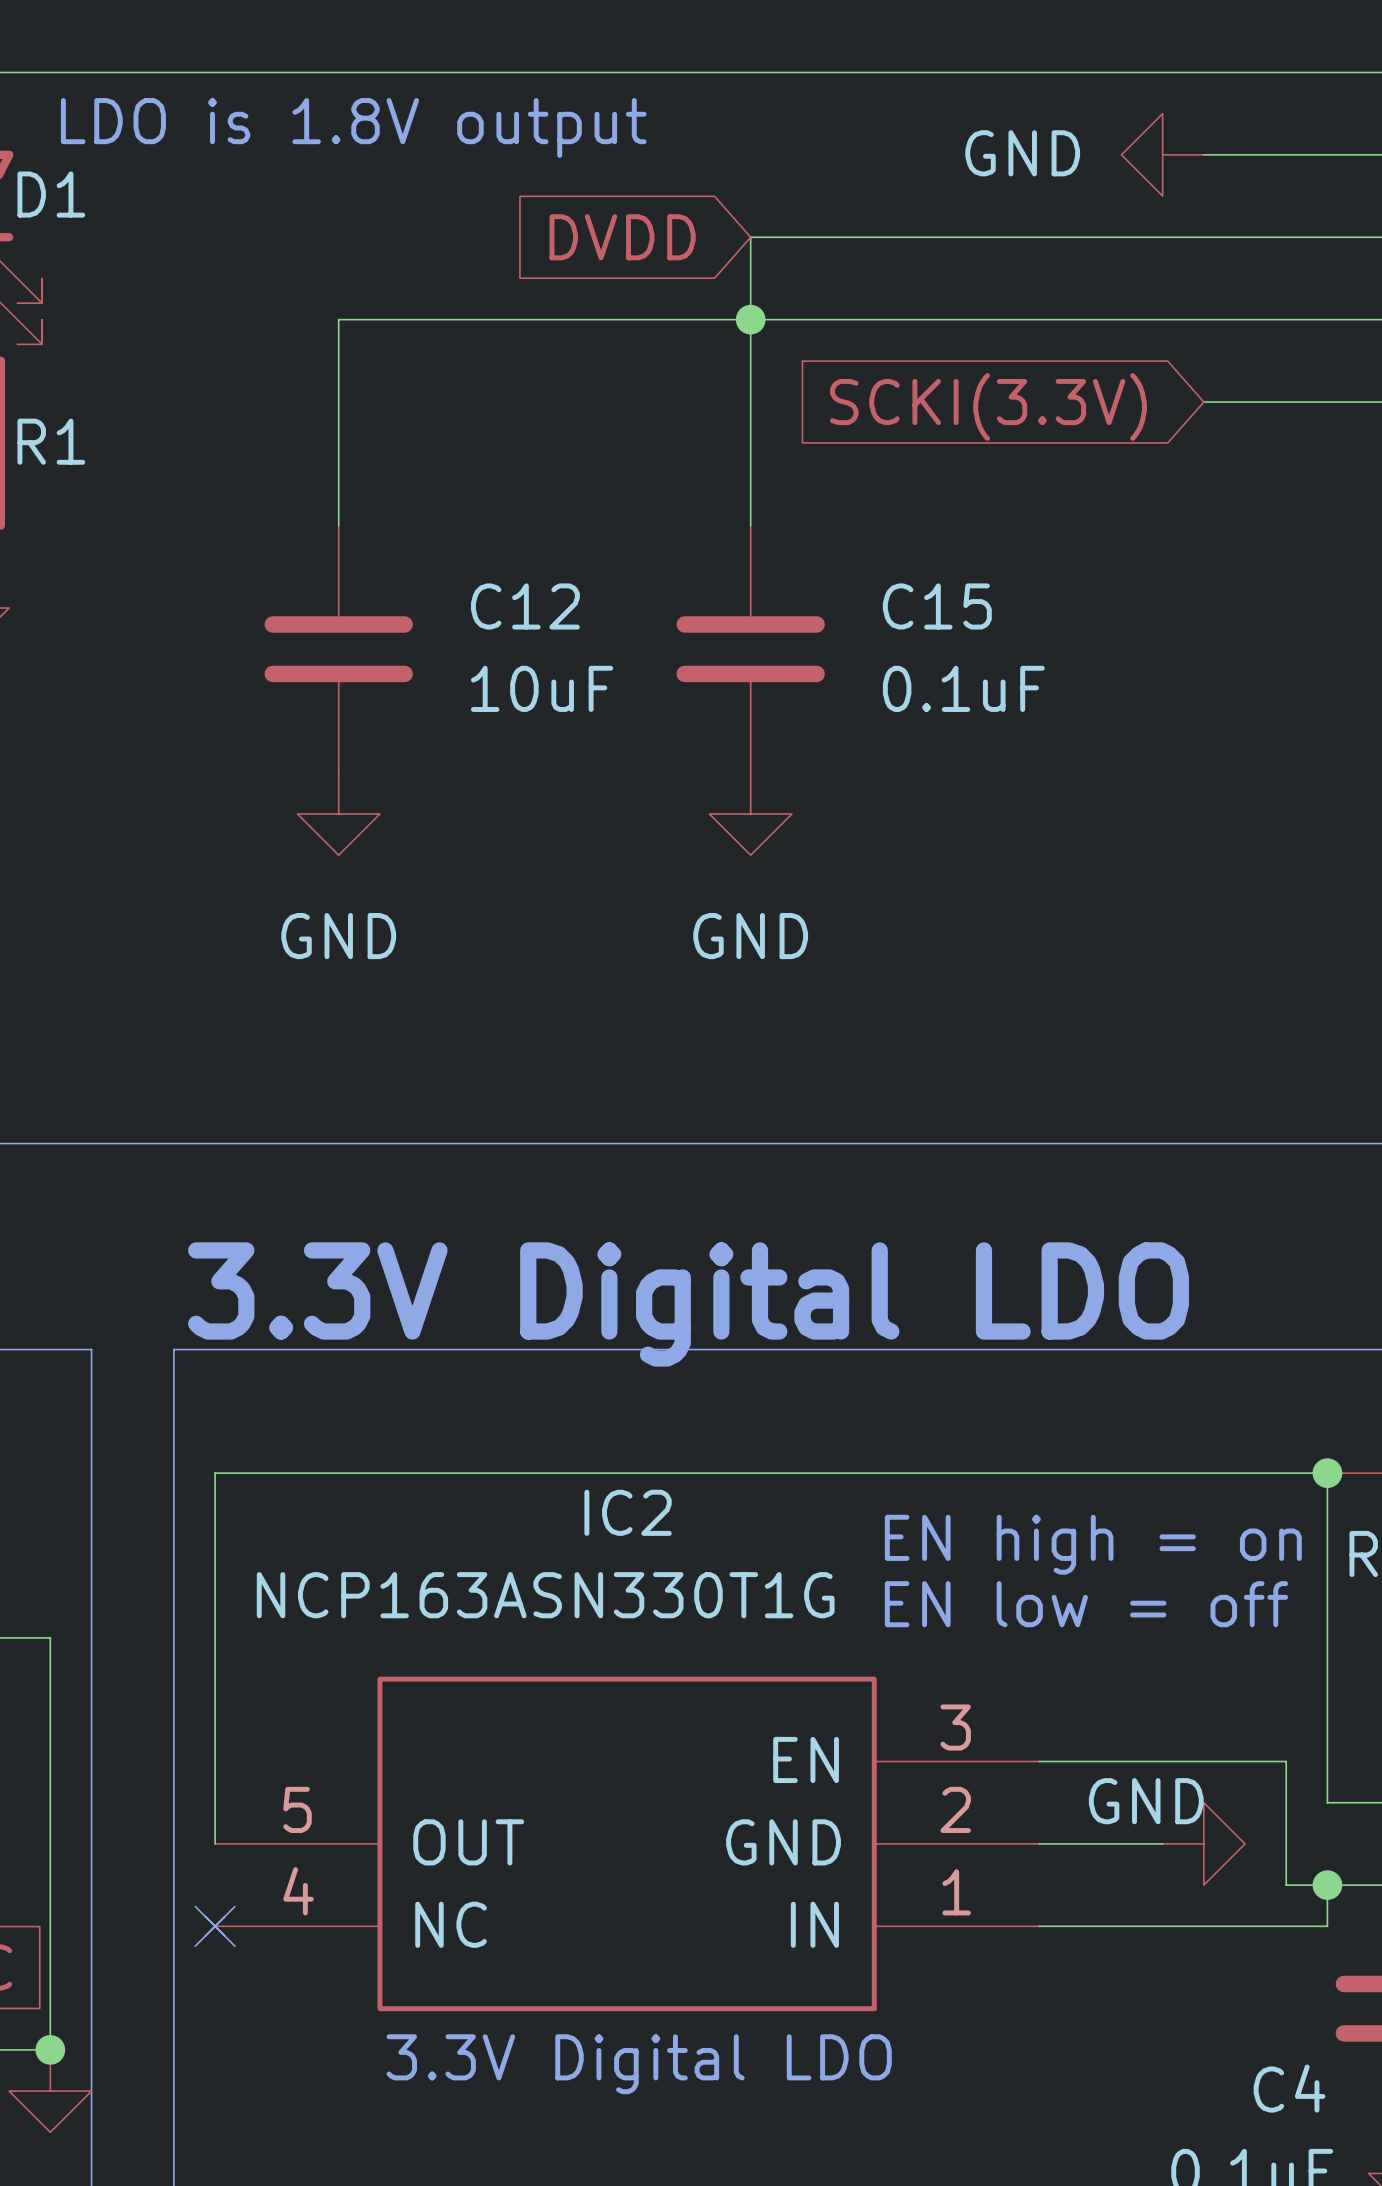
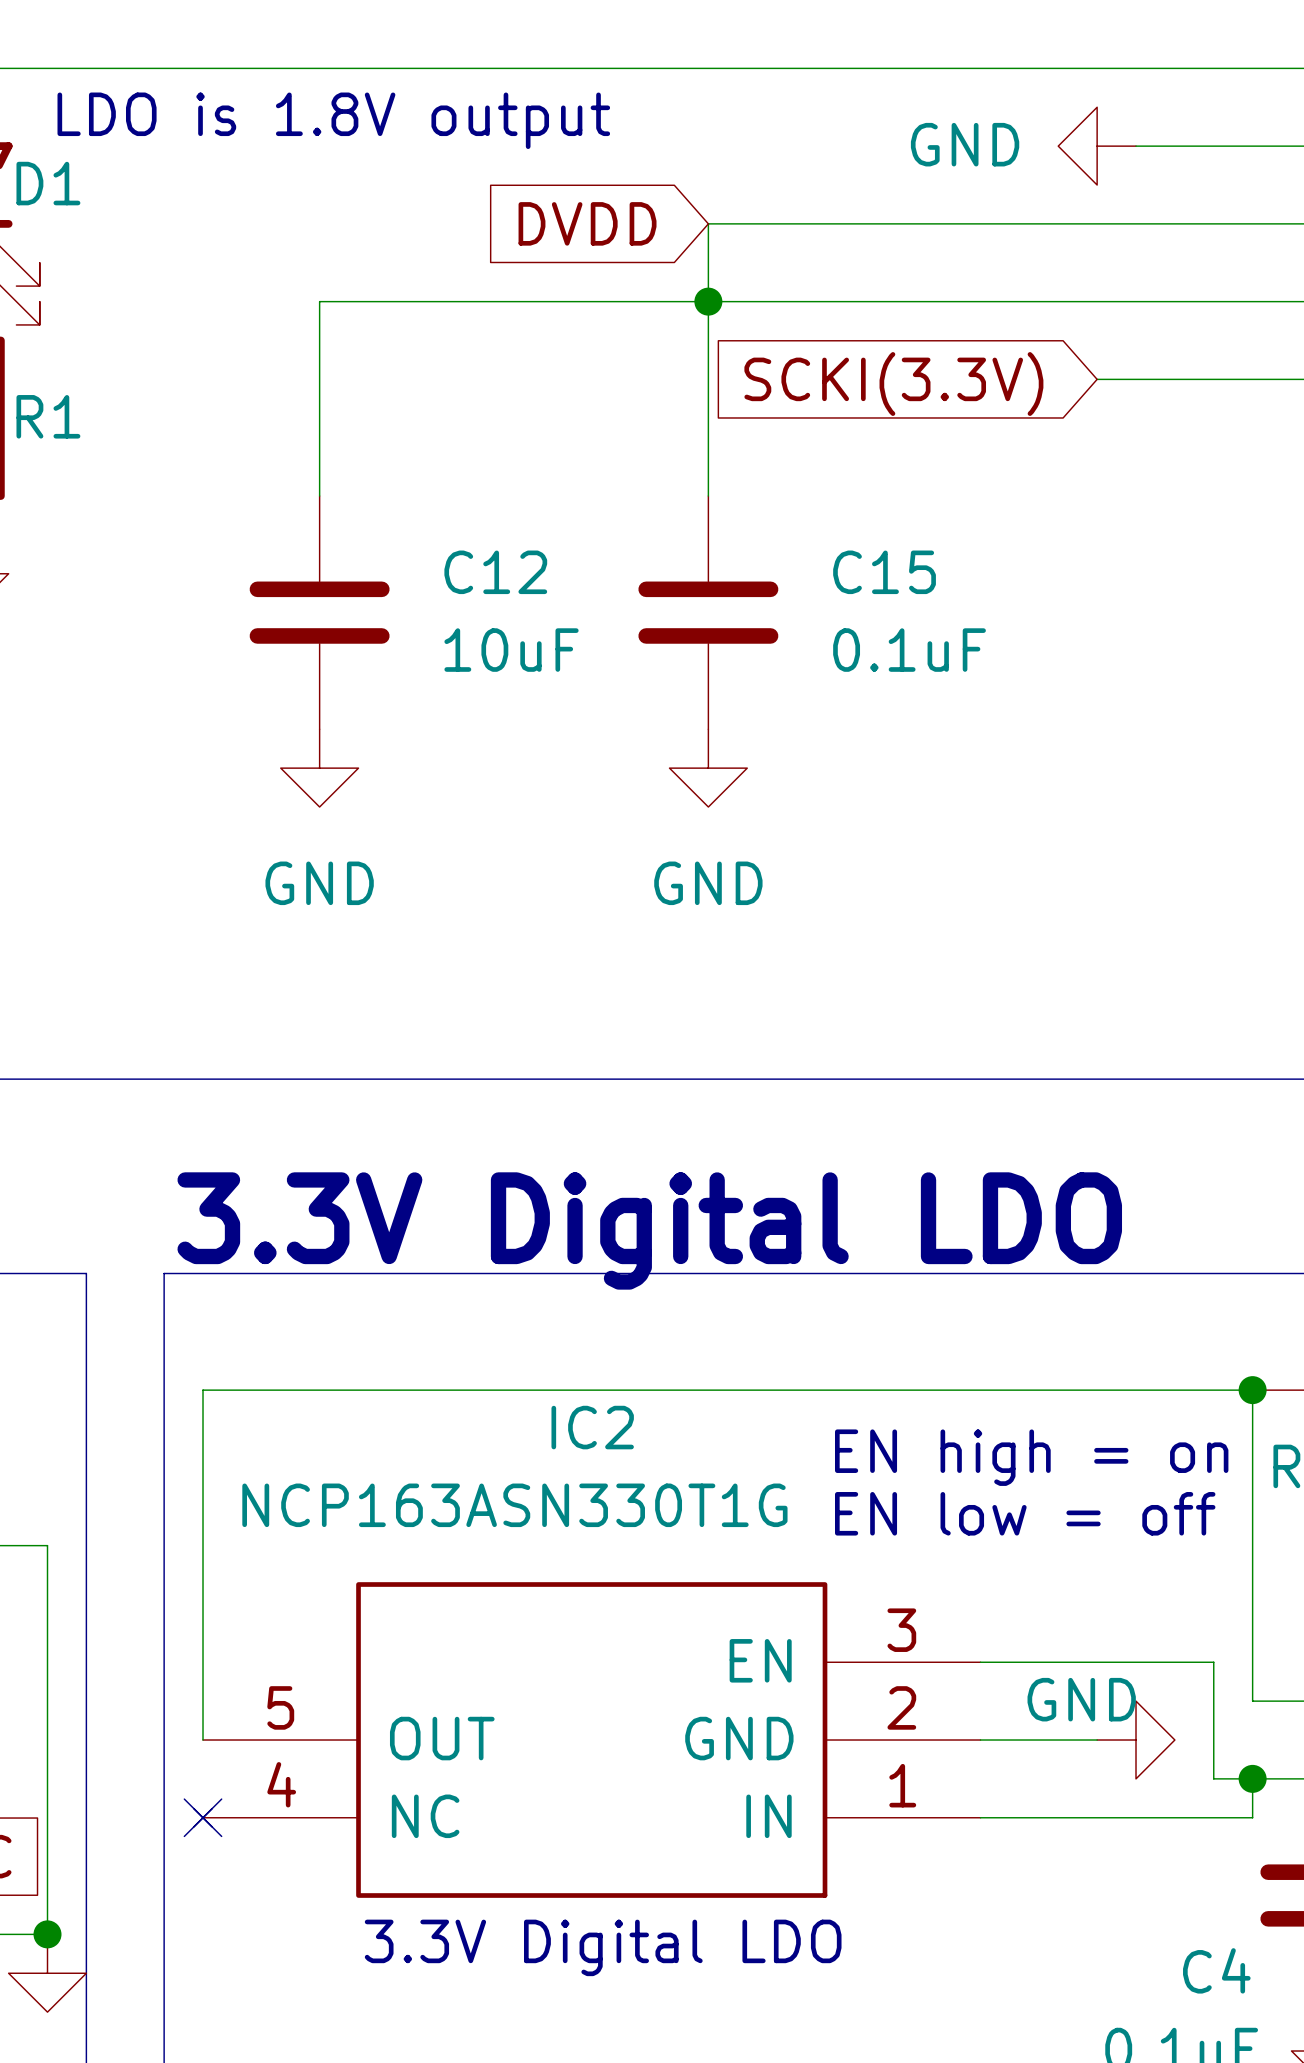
wire: none -> (1097, 379) (1136, 379)
global label position: SCKI(3.3V) (988, 406) -> SCKI(3.3V) (893, 384)

